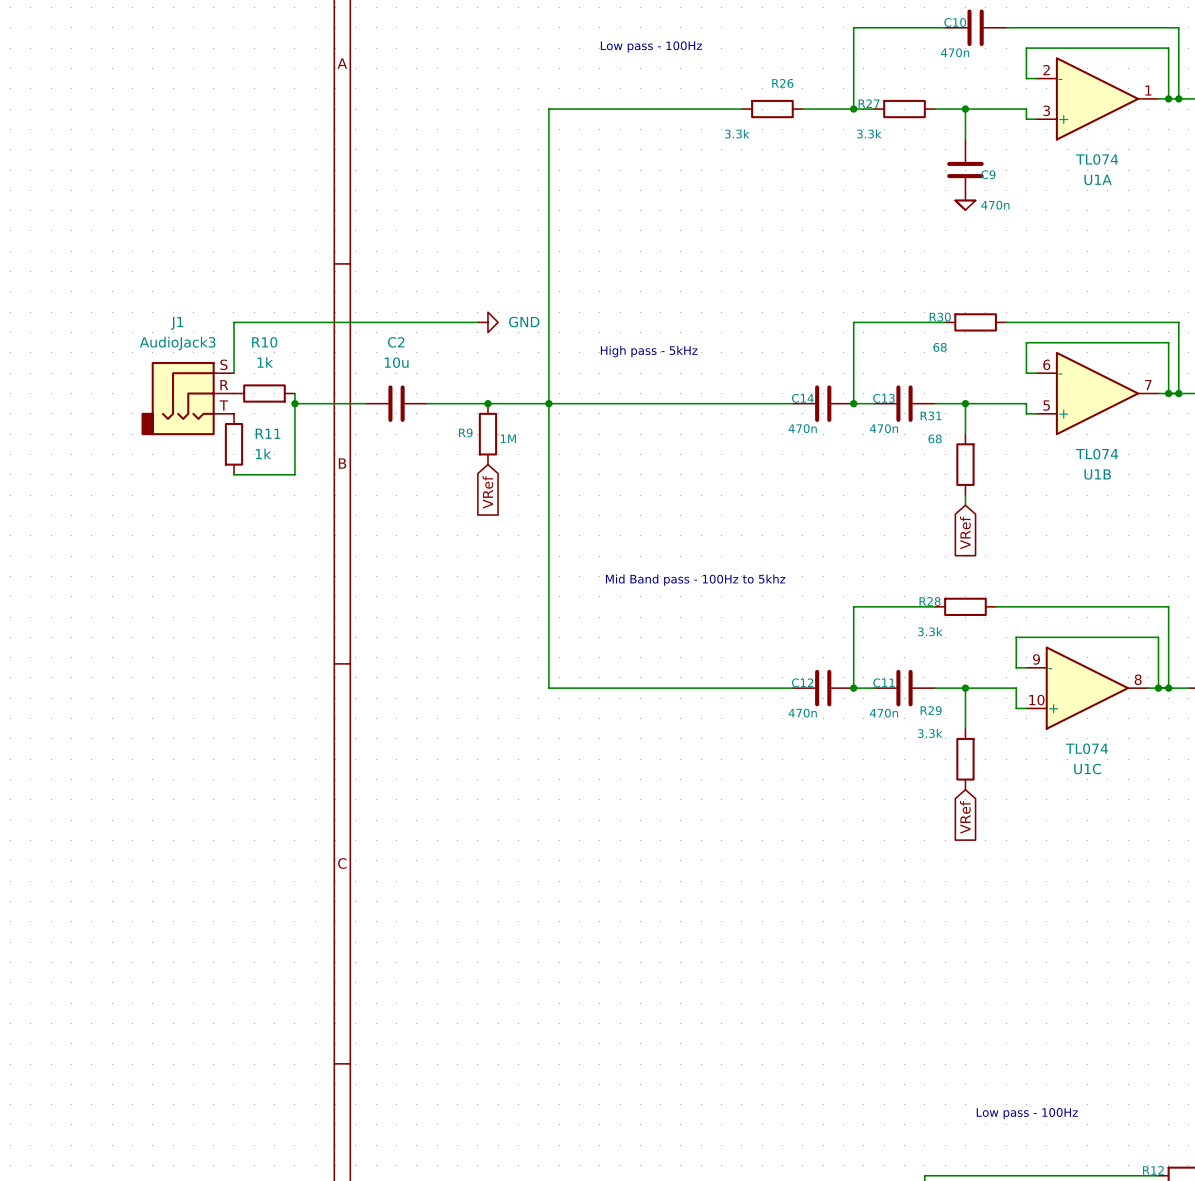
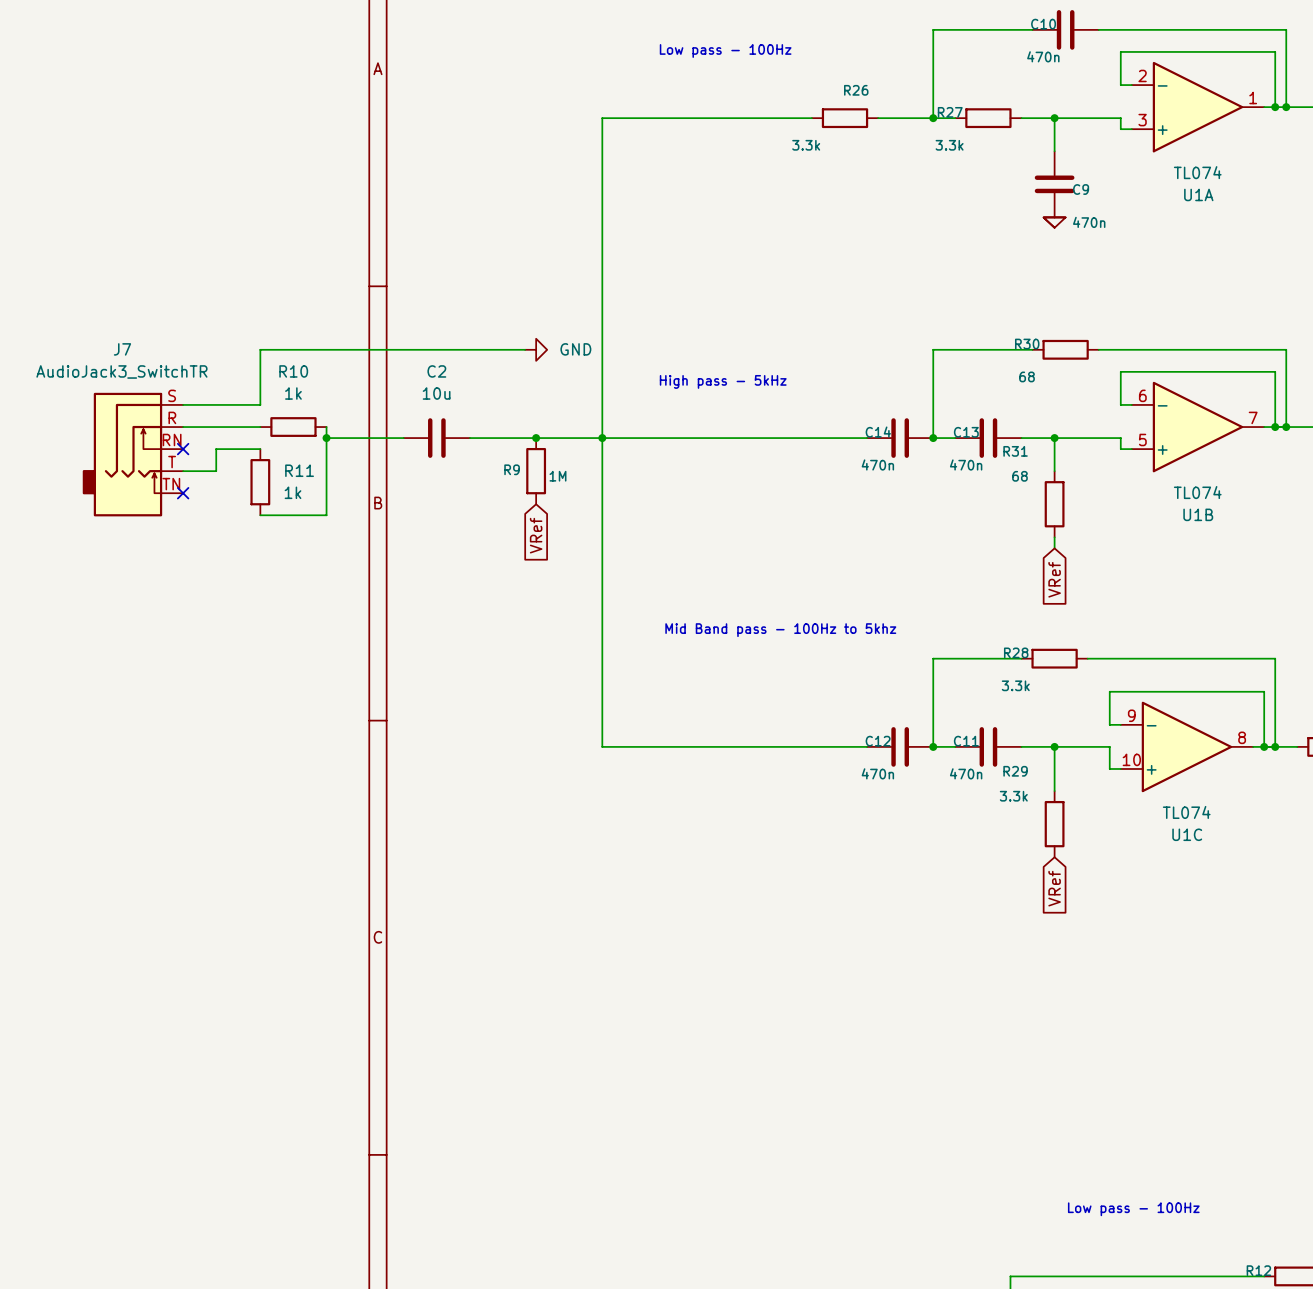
J1: AudioJack3 (187, 398) -> none
no-connect mark: none -> (183, 449)
J7: none -> AudioJack3_SwitchTR (132, 454)
no-connect mark: none -> (183, 493)

